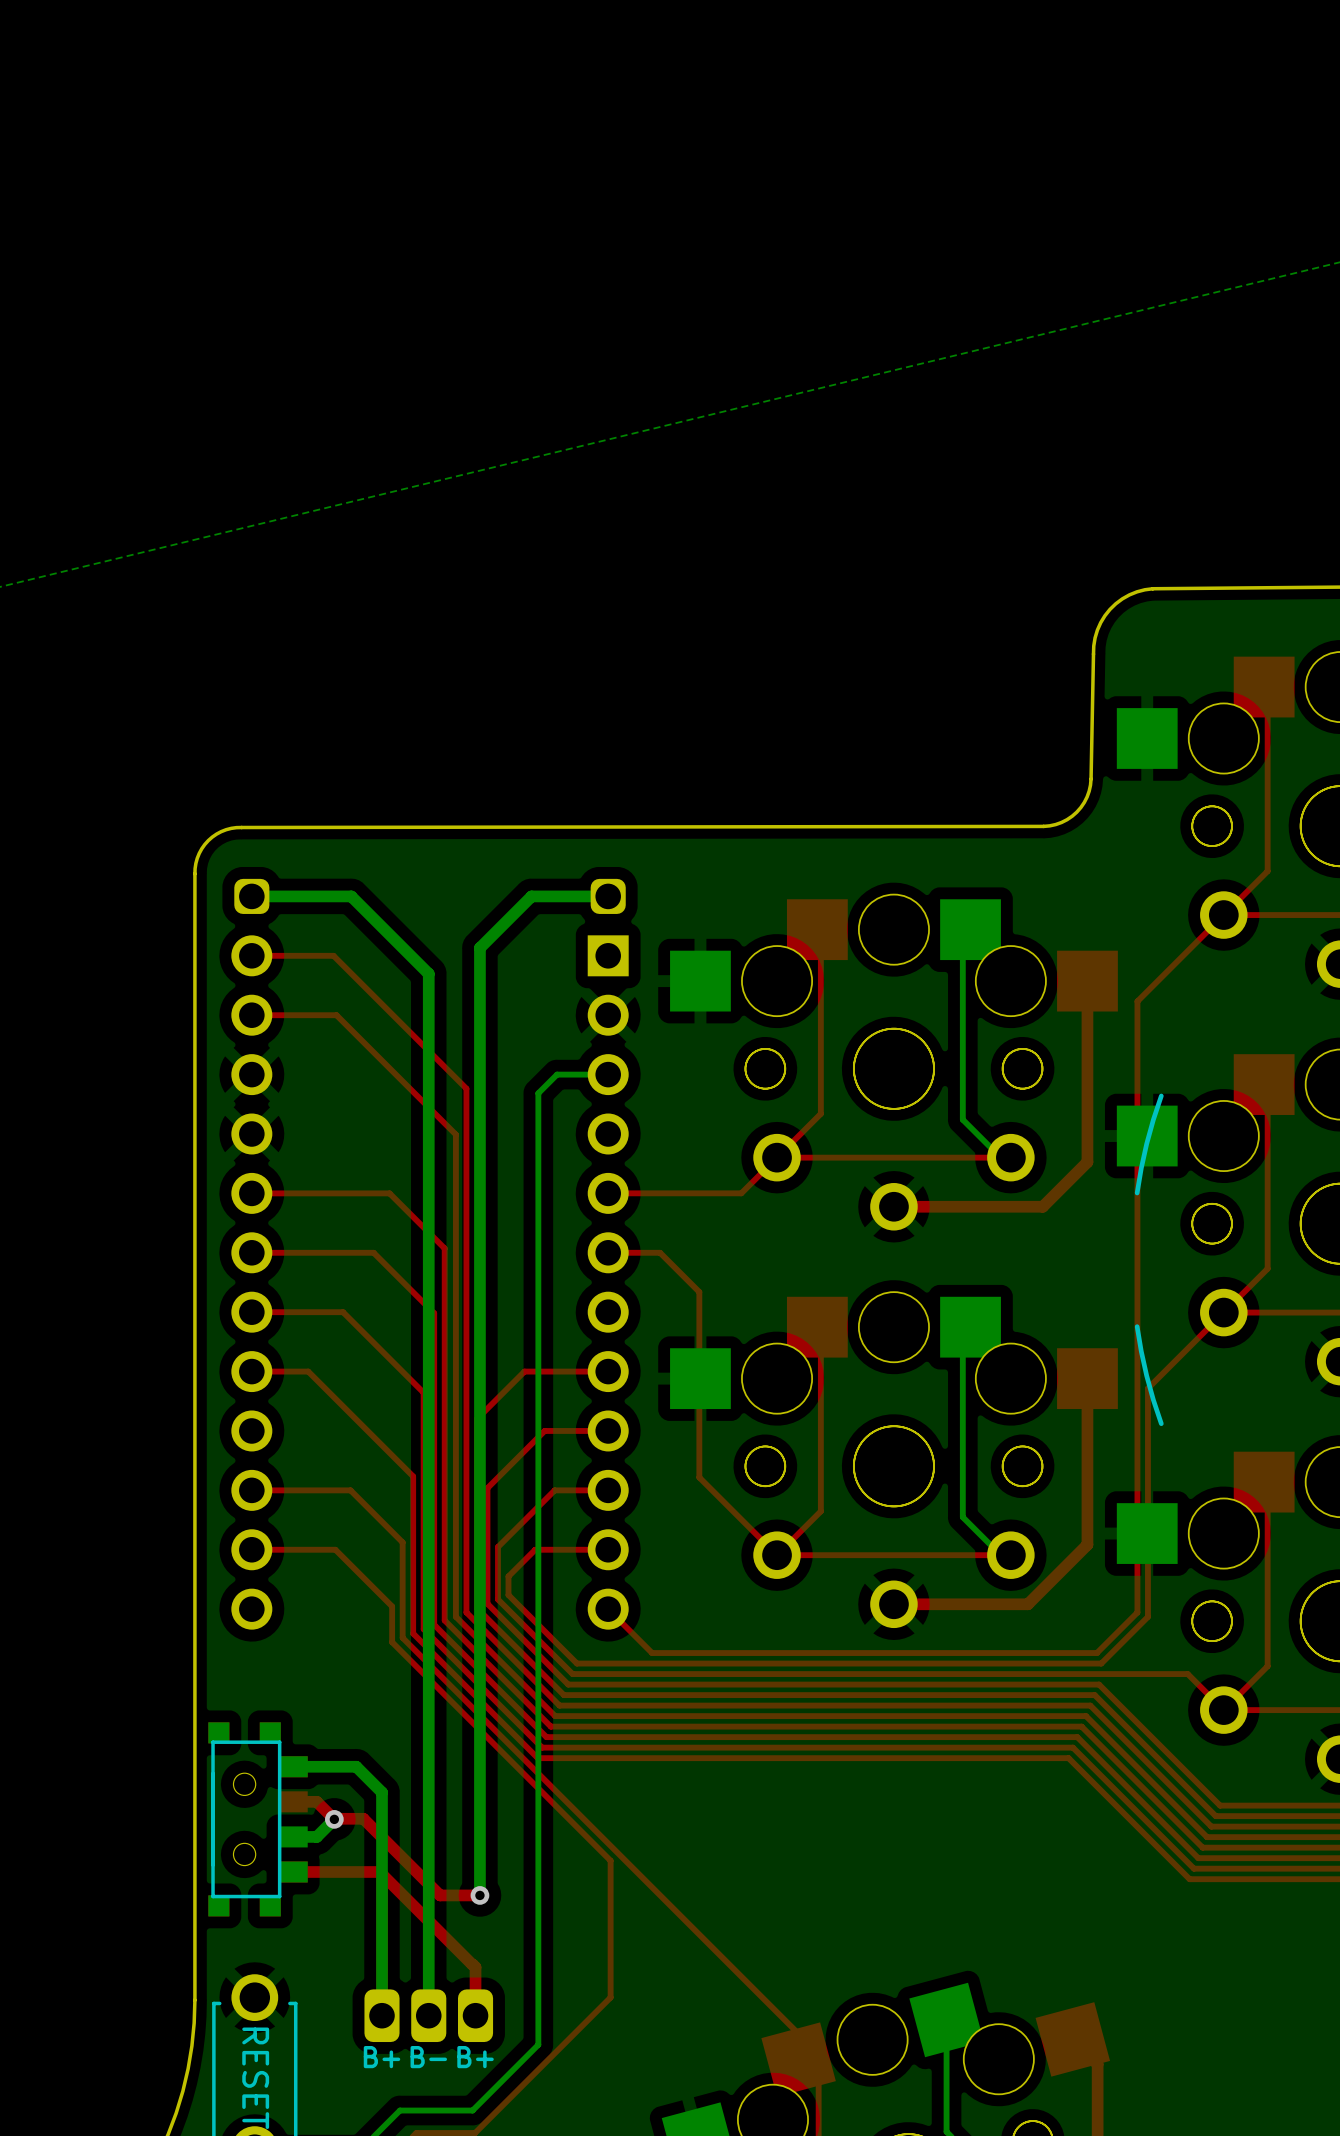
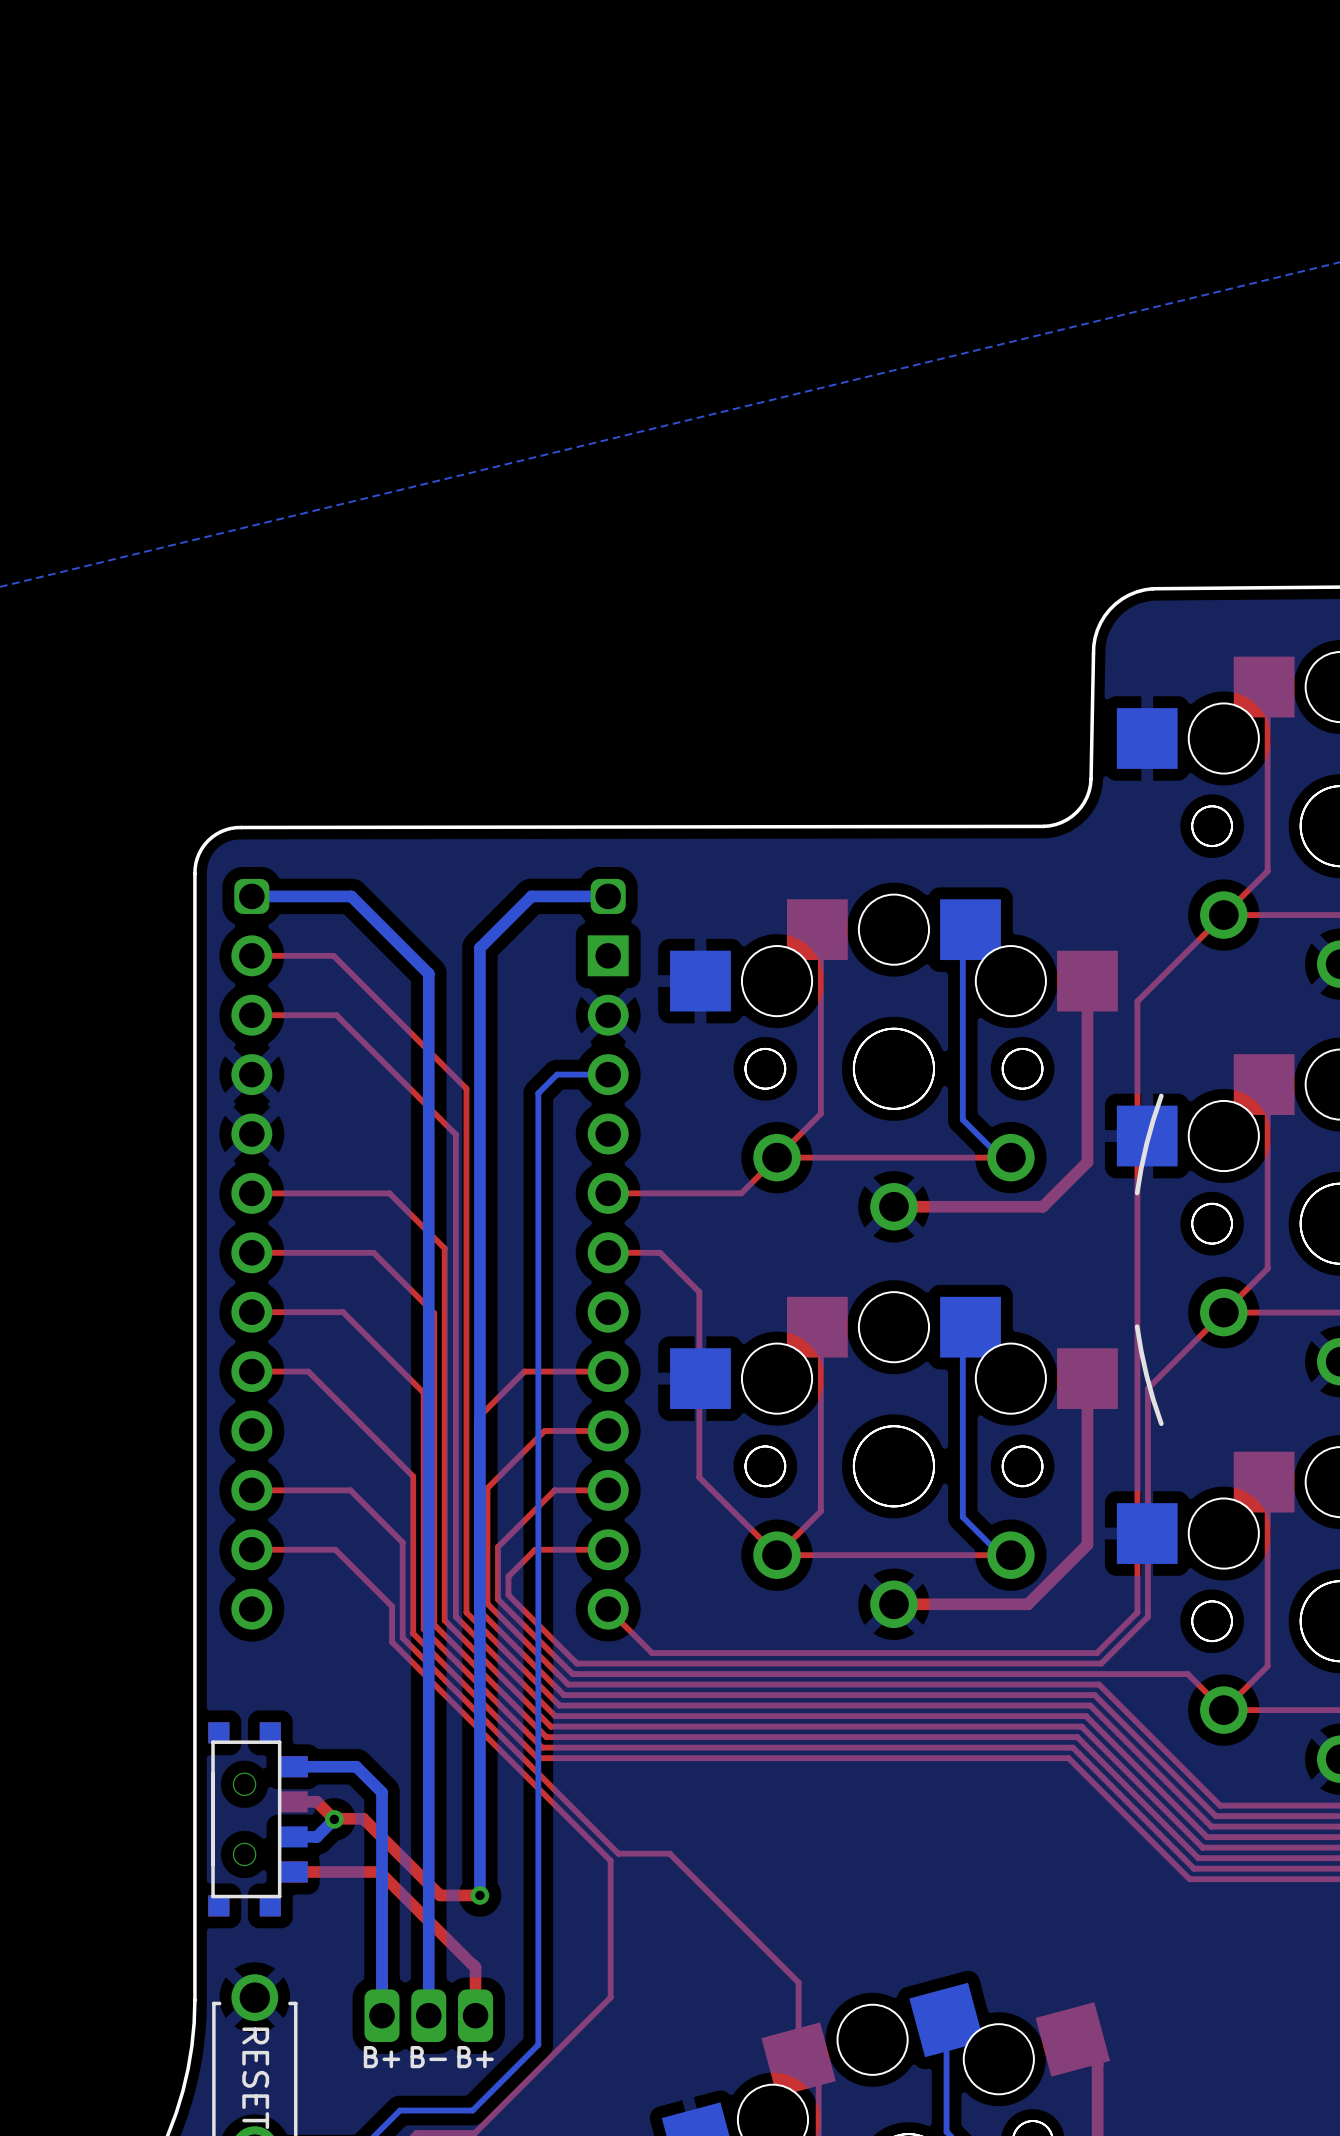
top track: (618, 1853) (798, 2033) -> (618, 1853) (669, 1853) (798, 1982) (798, 2033)

